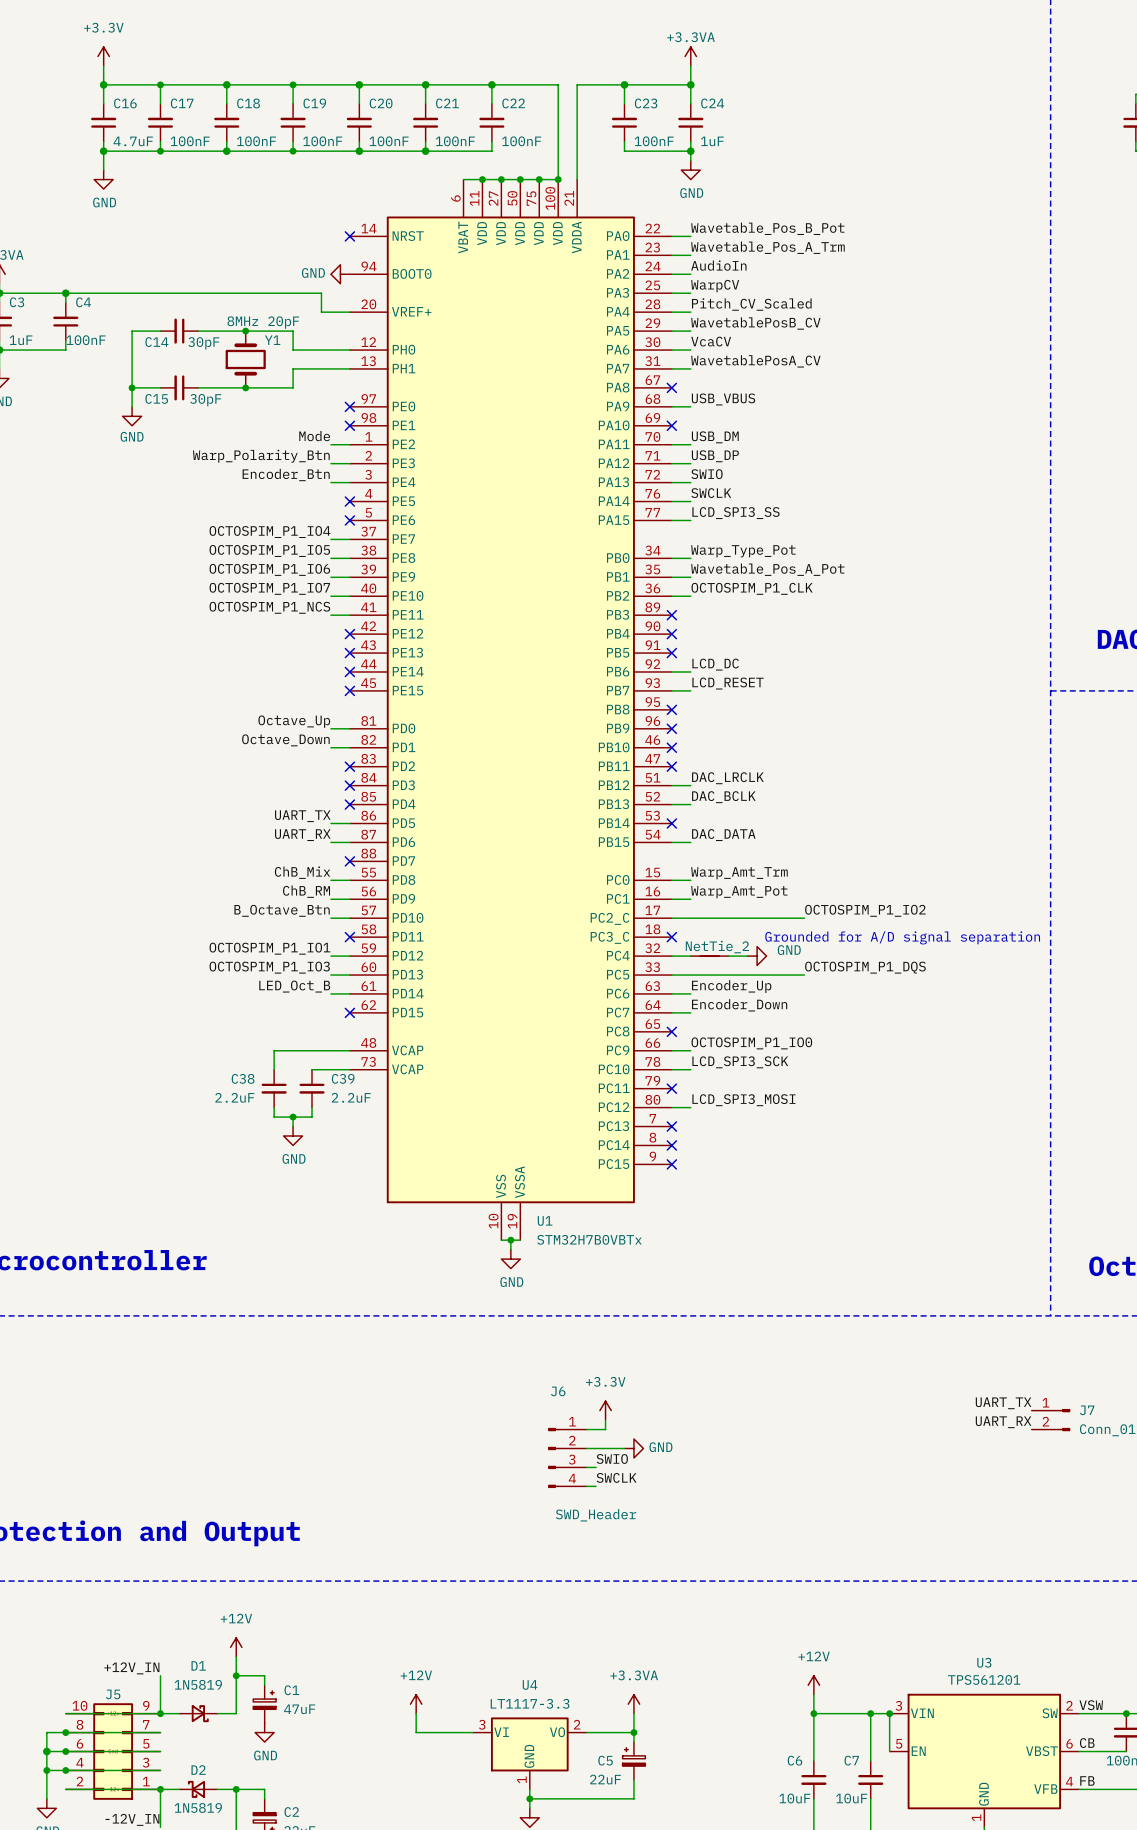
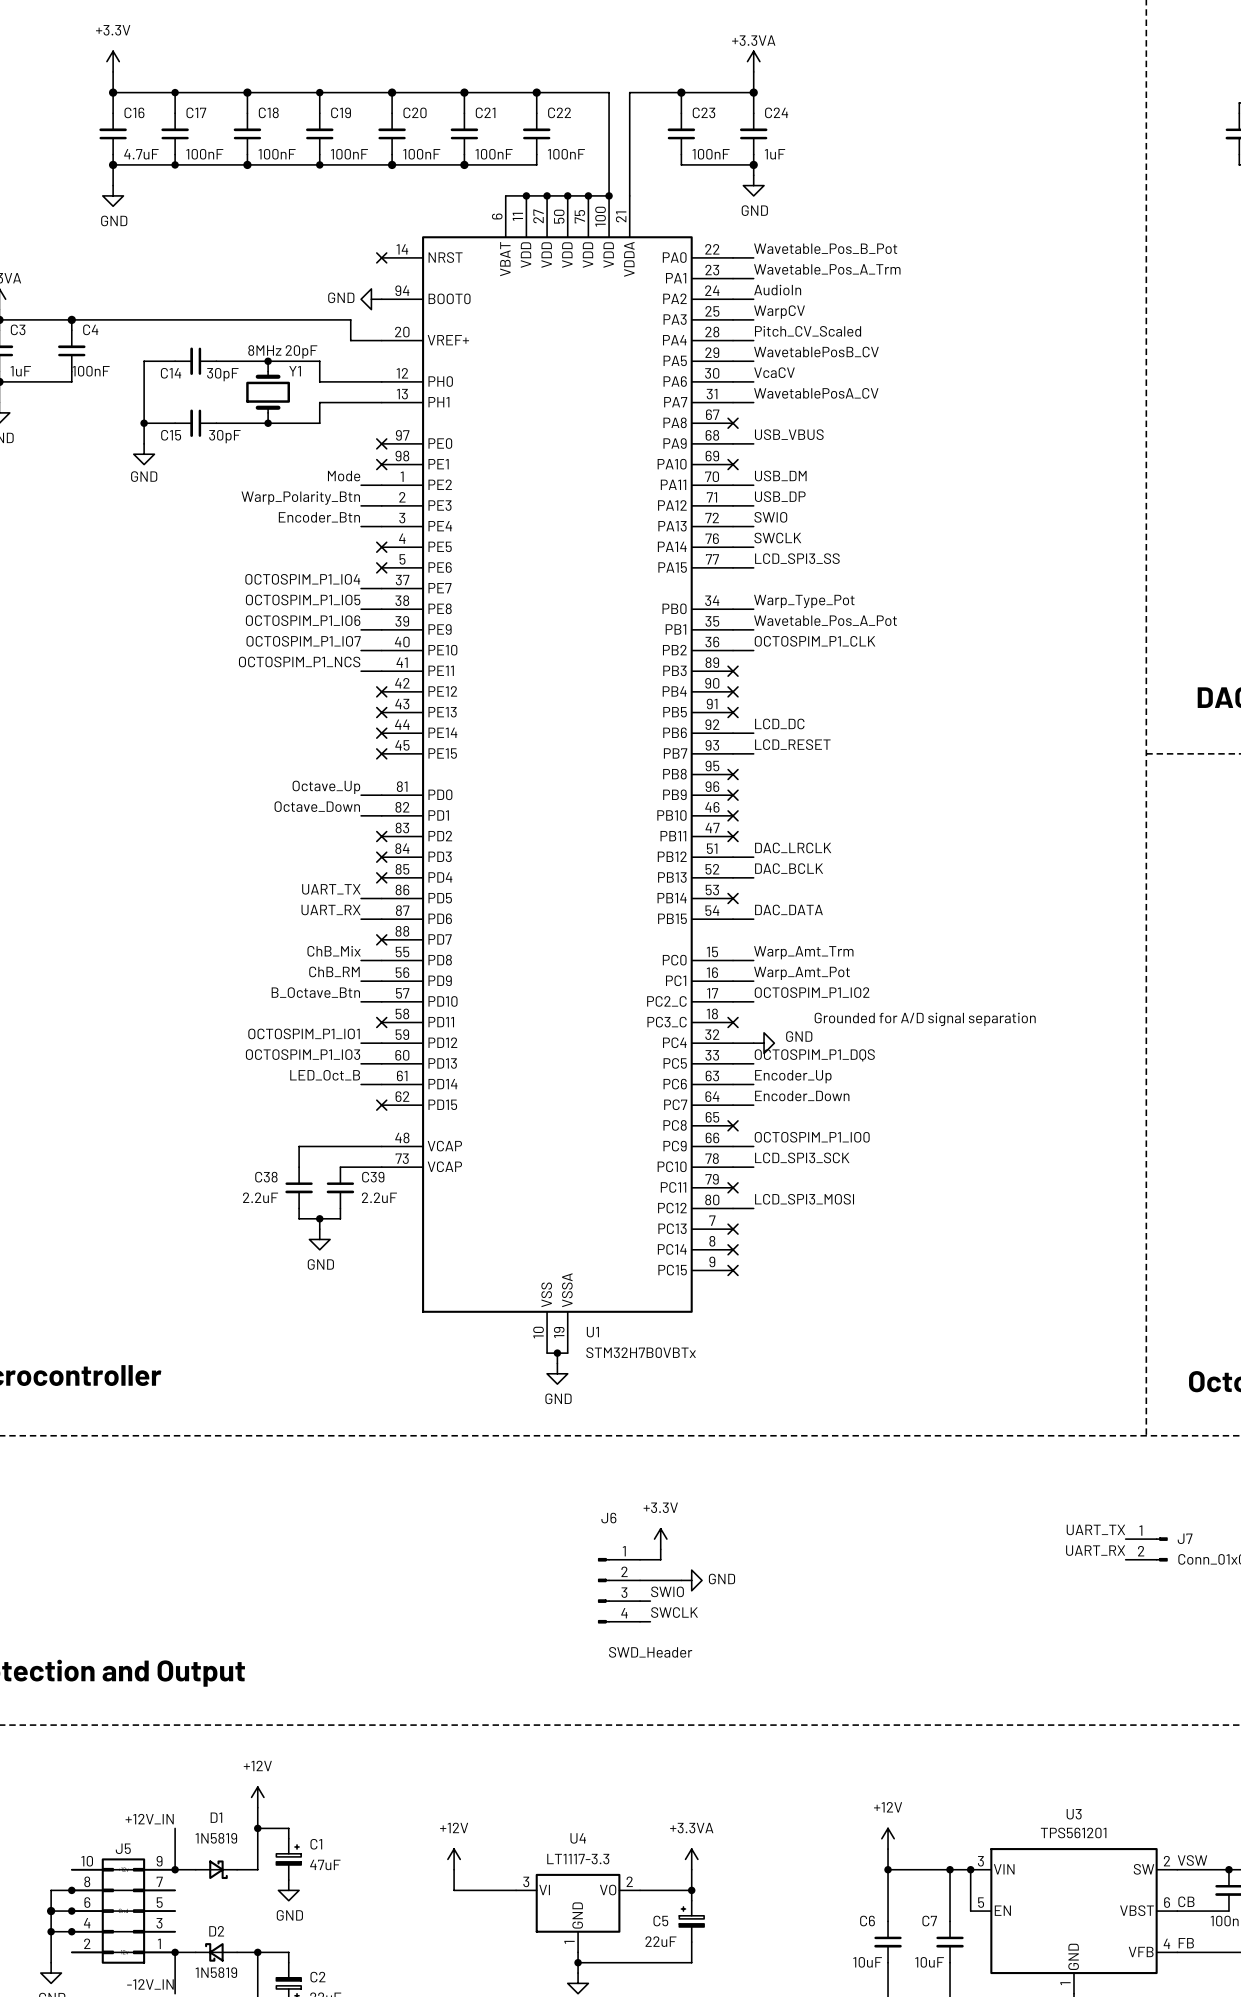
label position: OCTOSPIM_P1_IO2 (865, 910) -> OCTOSPIM_P1_IO2 (812, 992)
wire: (690, 918) (804, 918) -> none
text position: Grounded for A/D signal separation (902, 937) -> Grounded for A/D signal separation (925, 1019)
part: NetTie_2 (709, 956) -> none
wire: (728, 956) (747, 956) -> none
power symbol position: GND (757, 956) -> GND (764, 1043)
label position: OCTOSPIM_P1_DQS (865, 967) -> OCTOSPIM_P1_DQS (814, 1055)
wire: (690, 975) (804, 975) -> none

